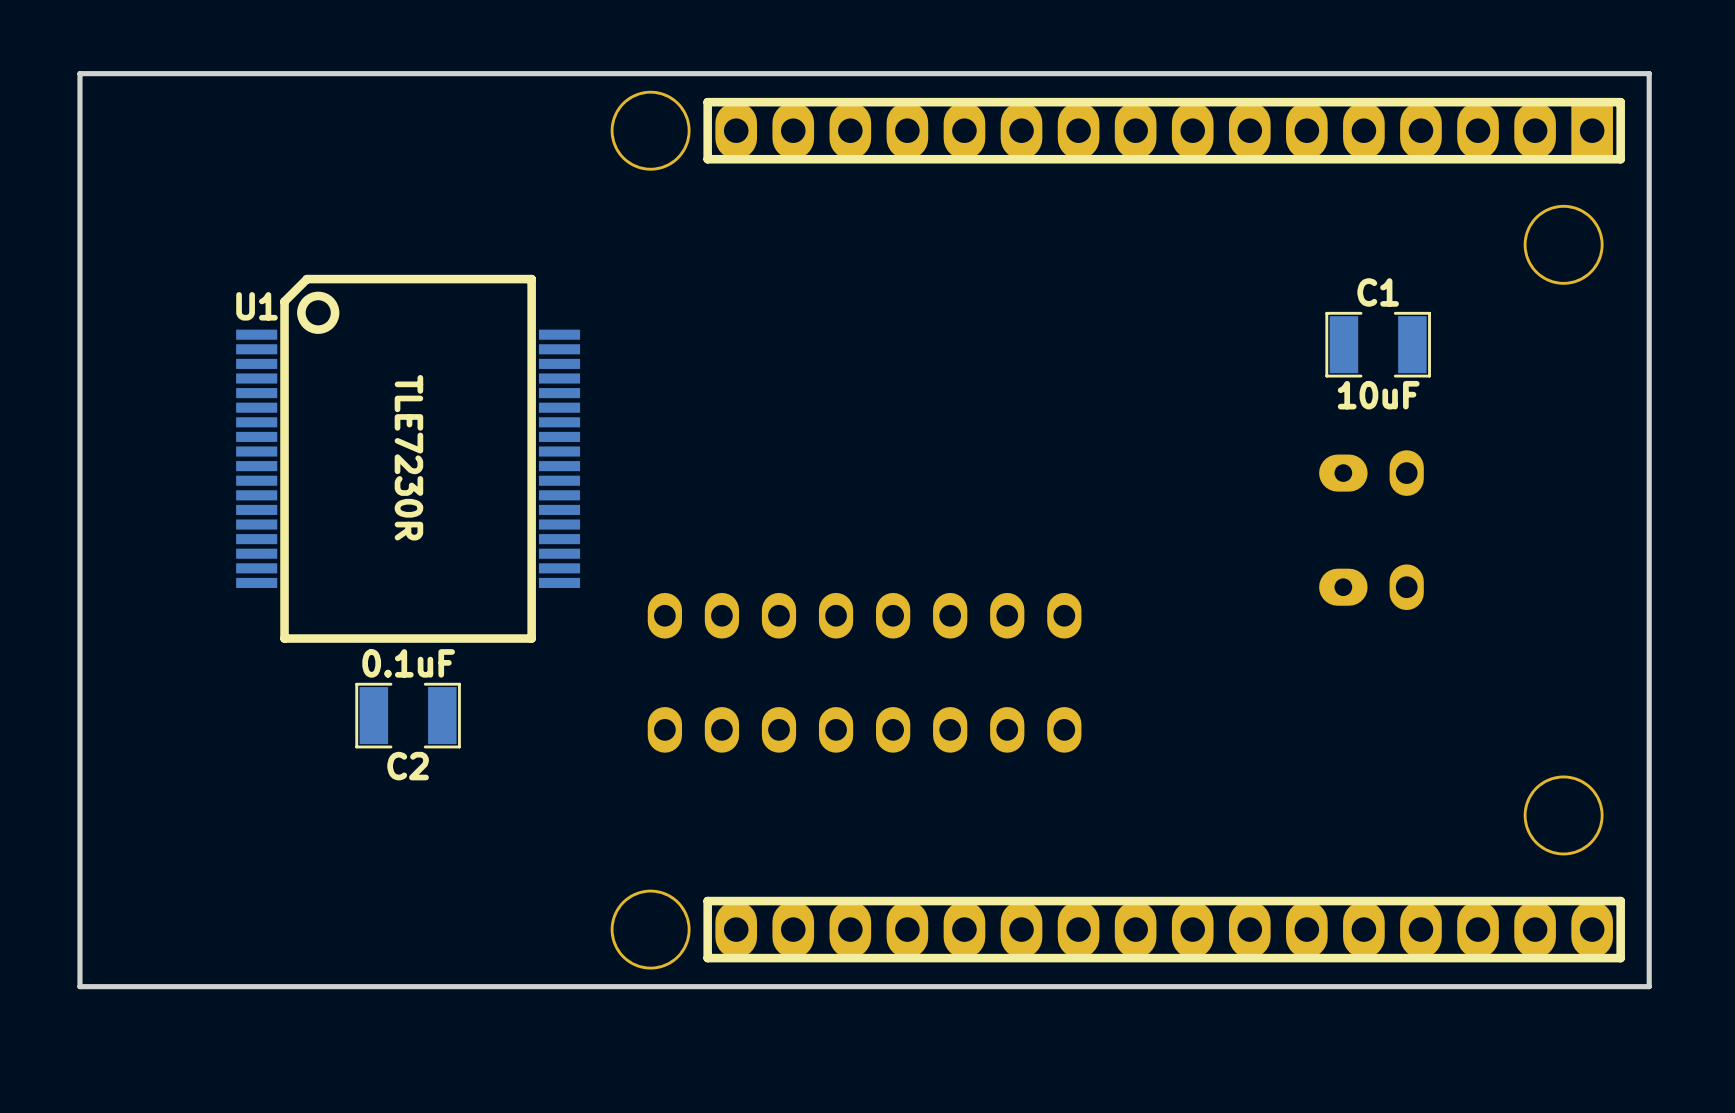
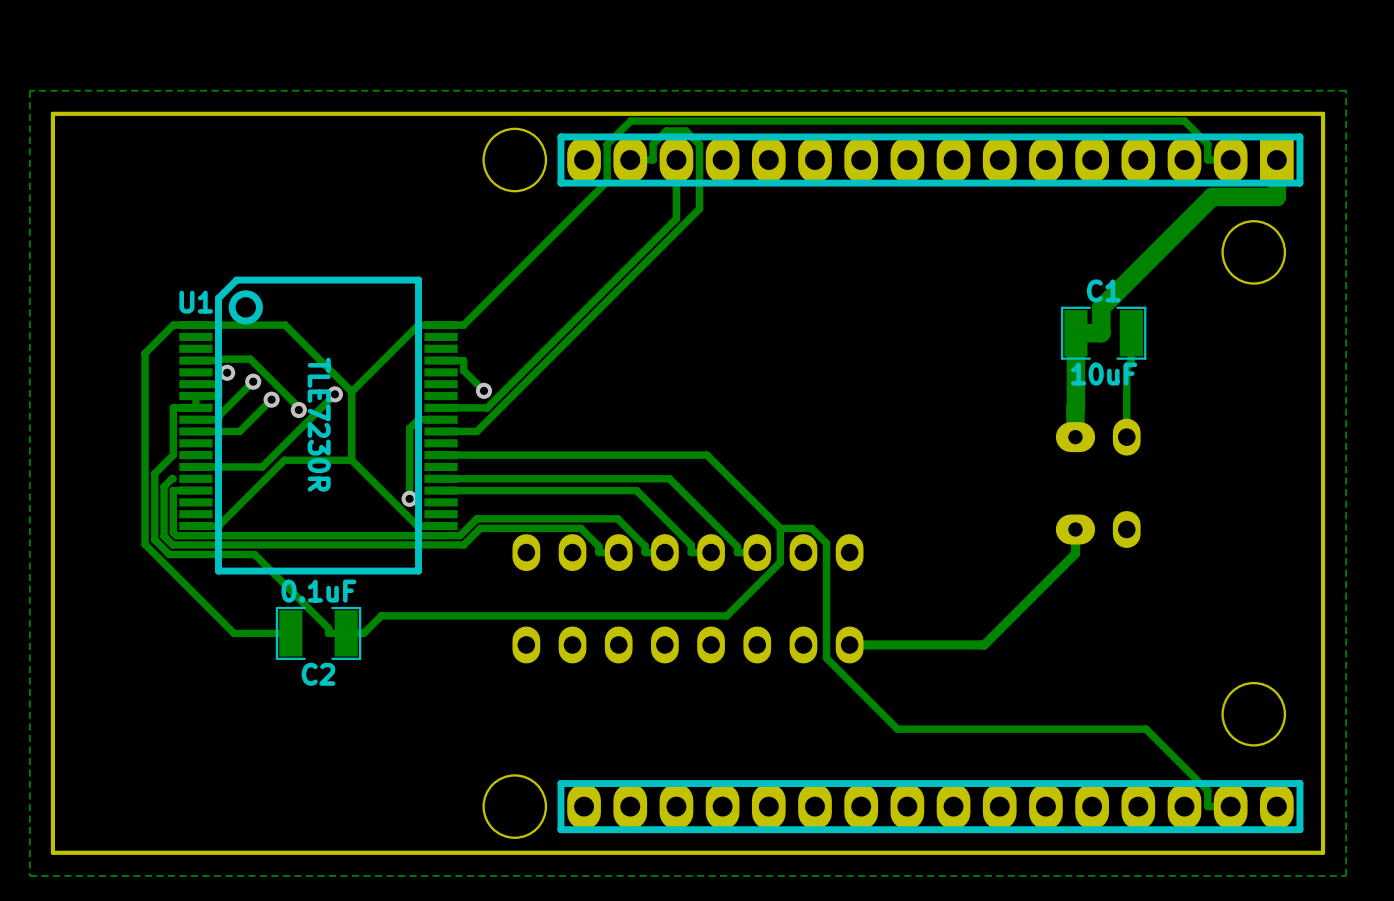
zone outline: none -> (1346, 90) (1346, 875) (29, 875) (29, 90) (1346, 90)
track: none -> (630, 160) (653, 160) (653, 144) (666, 130) (685, 130) (699, 144) (699, 208) (476, 431) (441, 431)
track: none -> (676, 160) (676, 218) (487, 407) (441, 407)
track: none -> (1230, 160) (1207, 160) (1207, 144) (1184, 121) (630, 121) (607, 144) (607, 181) (463, 325) (418, 325) (351, 391)
track: none -> (1276, 160) (1276, 196) (1212, 196) (1101, 307) (1101, 333) (1075, 333) (1075, 437)
track: none -> (1131, 333) (1131, 362) (1126, 366) (1126, 437)
track: none -> (195, 360) (250, 359) (298, 407) (298, 409)
track: none -> (441, 360) (463, 360) (463, 370) (483, 390)
via: none -> (227, 372)
track: none -> (253, 381) (218, 416) (218, 419) (195, 419)
via: none -> (253, 381)
track: none -> (195, 384) (218, 384) (218, 396) (195, 396) (195, 407) (173, 407) (173, 455) (154, 473) (154, 540) (169, 554) (254, 554) (328, 628) (328, 633) (363, 633) (381, 615) (726, 615) (780, 562) (780, 528)
via: none -> (483, 390)
track: none -> (351, 391) (351, 460)
track: none -> (351, 391) (285, 325) (173, 325) (145, 353) (145, 544) (234, 633) (290, 633)
track: none -> (334, 394) (262, 466) (195, 466)
via: none -> (334, 394)
track: none -> (271, 399) (239, 431) (195, 431)
via: none -> (271, 399)
via: none -> (298, 409)
track: none -> (441, 419) (418, 419) (409, 428) (409, 498)
track: none -> (441, 455) (707, 455) (780, 528)
track: none -> (351, 460) (417, 526) (441, 526)
track: none -> (351, 460) (284, 460) (218, 526) (195, 526)
track: none -> (173, 478) (164, 486) (164, 536) (172, 544) (463, 544) (480, 528) (580, 528) (598, 546) (598, 552) (618, 552)
track: none -> (441, 478) (669, 478) (737, 546) (737, 552) (757, 552)
track: none -> (195, 490) (173, 490) (173, 532) (176, 535) (459, 535) (476, 518) (617, 518) (645, 546) (645, 552) (664, 552)
track: none -> (441, 490) (636, 490) (691, 545) (691, 552) (711, 552)
via: none -> (409, 498)
track: none -> (780, 528) (811, 528) (826, 543) (826, 658) (897, 729) (1146, 729) (1207, 790) (1207, 806) (1230, 806)
track: none -> (1075, 529) (1075, 553) (984, 644) (849, 644)

